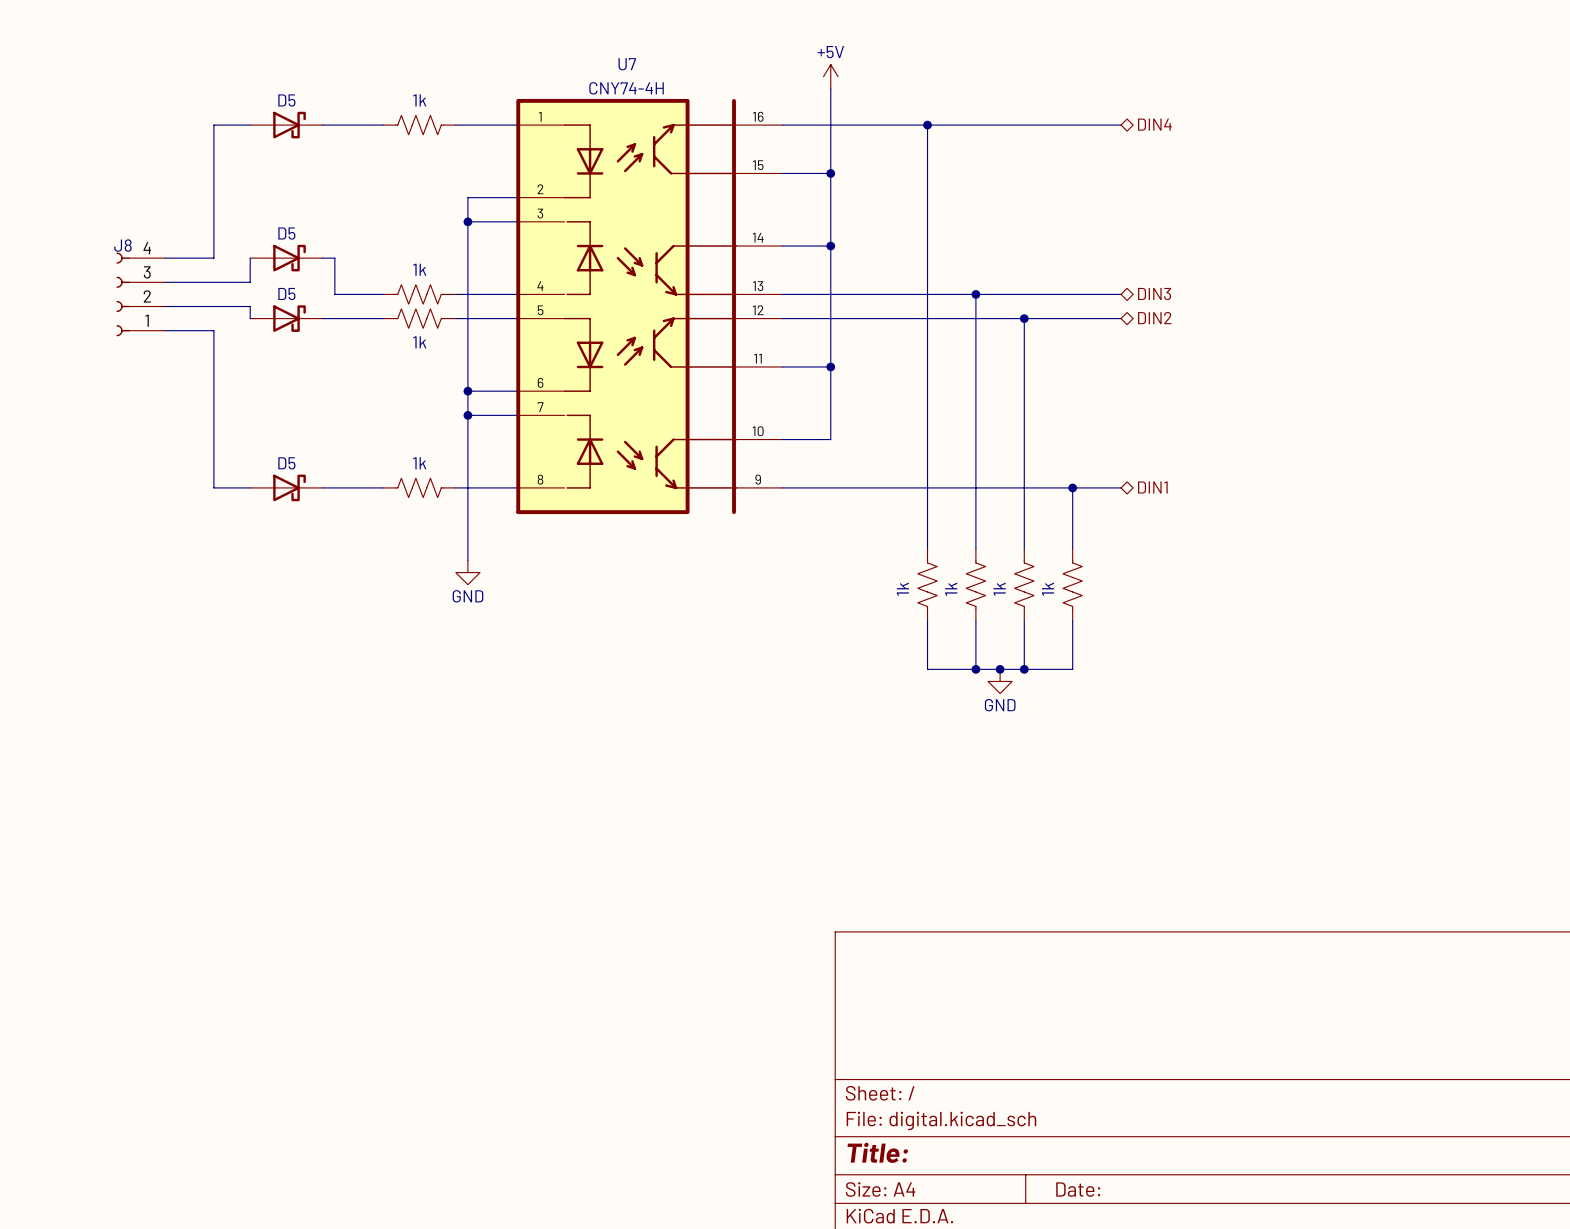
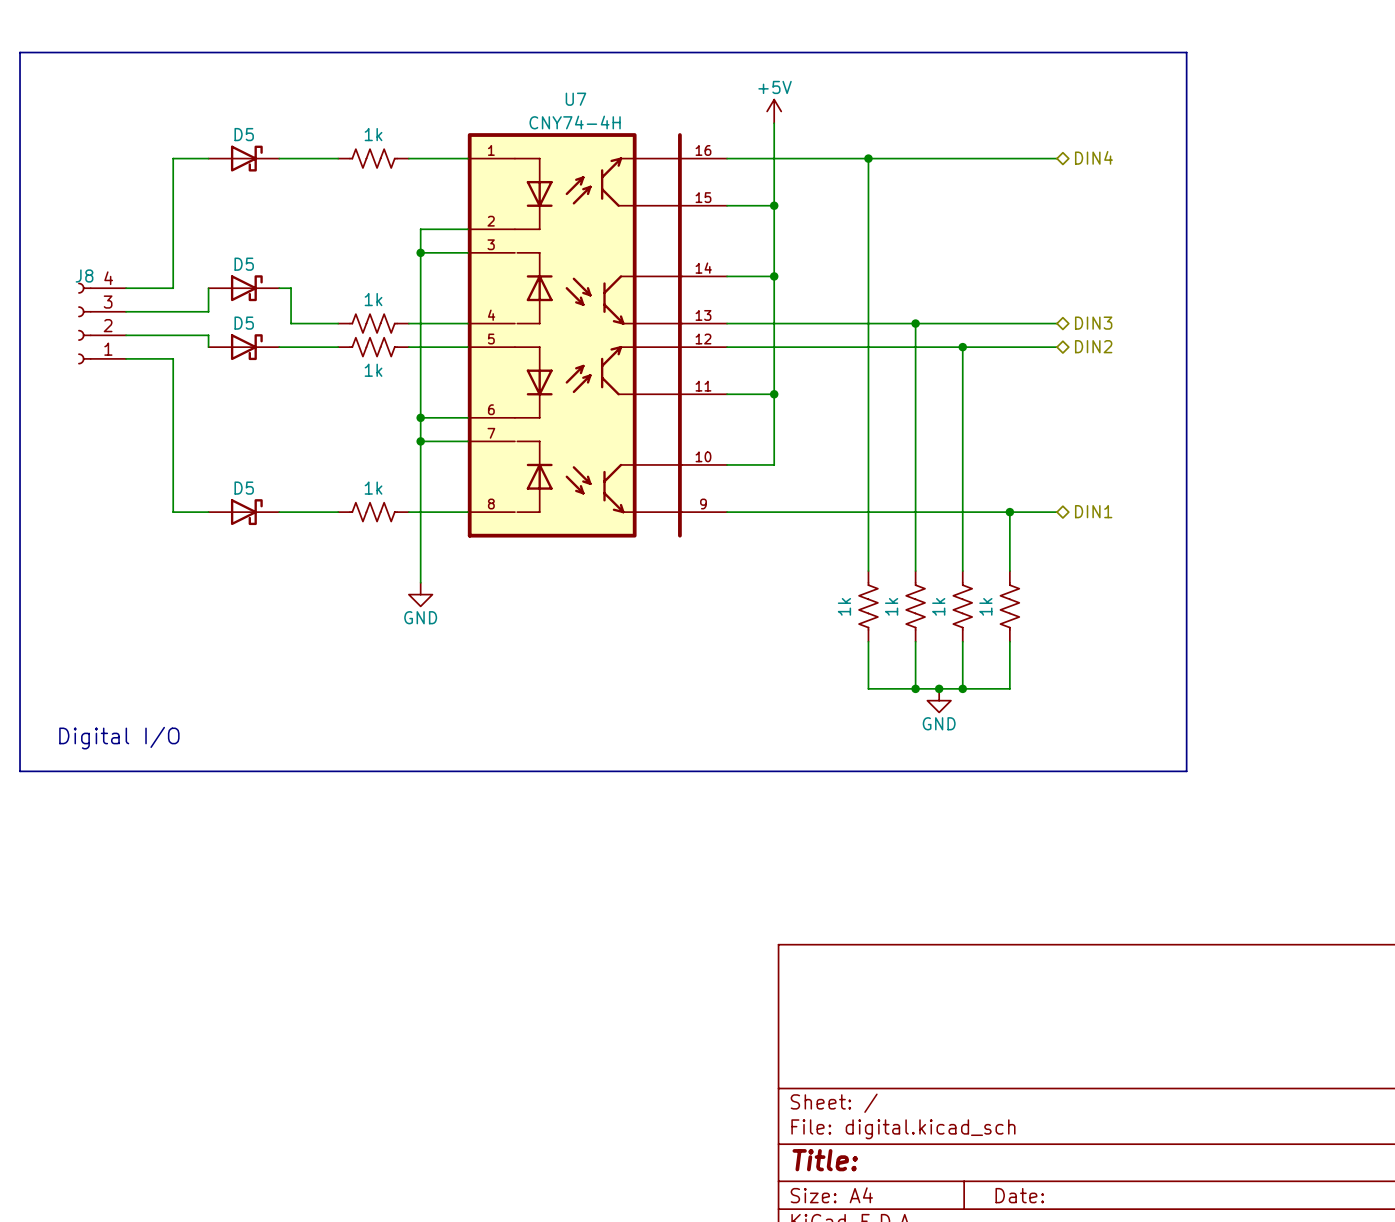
line: none -> (20, 52) (1186, 52) (1186, 771) (20, 771) (20, 52)
text: none -> Digital I/O (119, 738)

